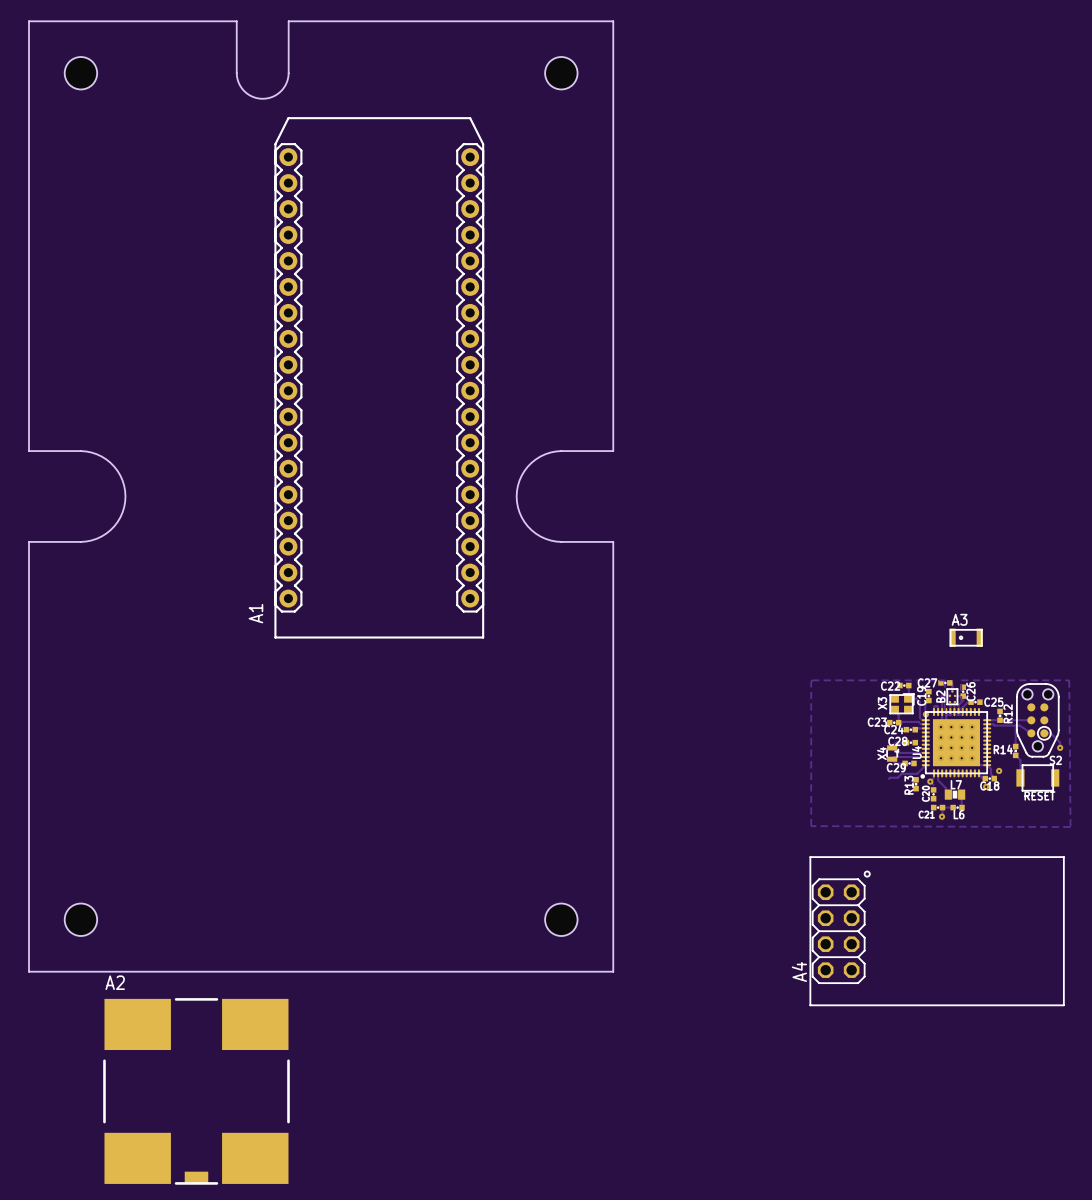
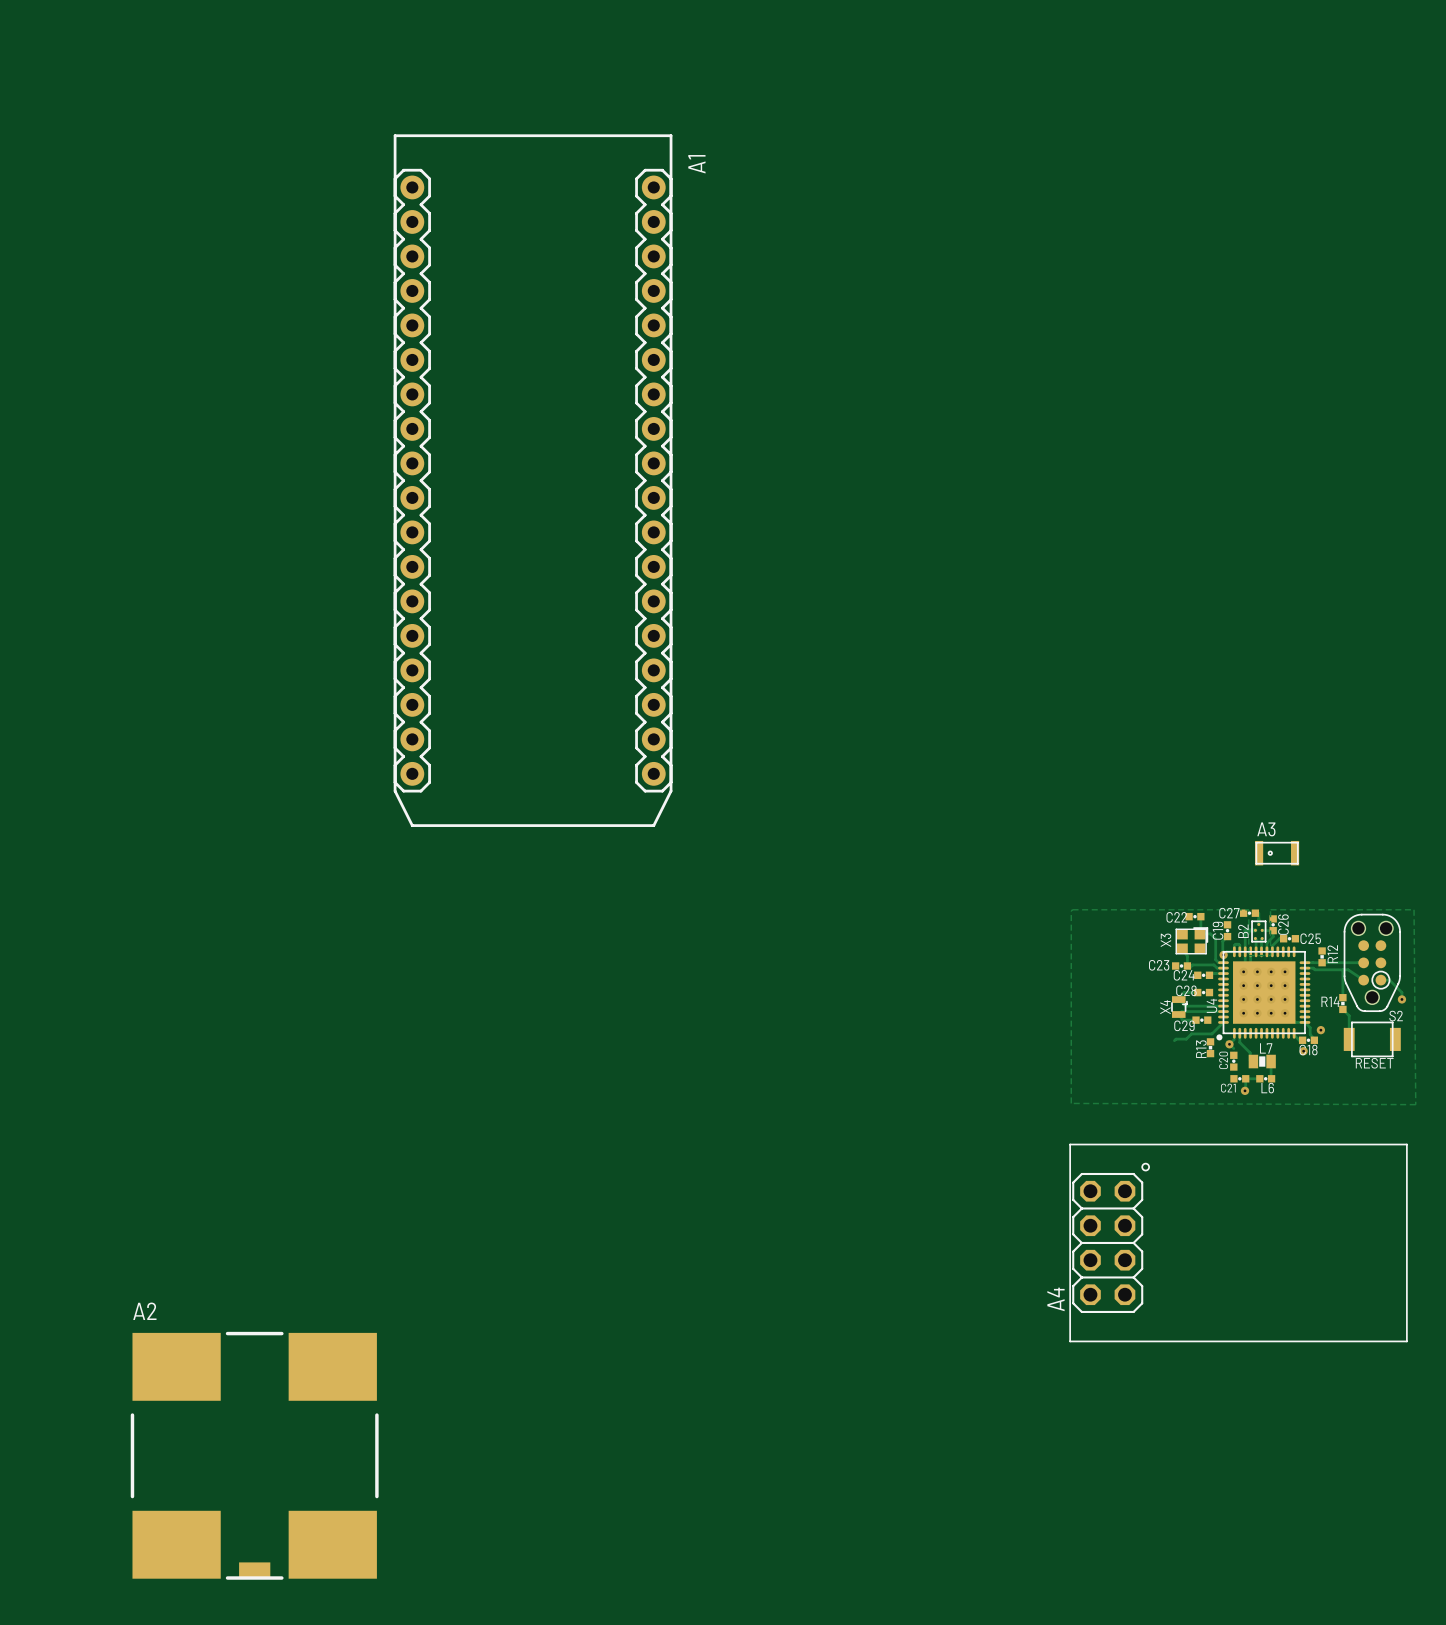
board edge: (29, 21) (29, 451) (80, 451) (101, 456) (110, 462) (120, 475) (125, 496) (120, 517) (110, 530) (101, 536) (80, 541) (29, 541) (29, 971) (613, 971) (613, 541) (561, 541) (540, 536) (524, 522) (519, 512) (516, 496) (519, 480) (524, 470) (540, 456) (561, 451) (613, 451) (613, 21) (288, 21) (287, 79) (278, 93) (262, 98) (247, 93) (237, 79) (236, 21) (29, 21) -> none
hole: (80, 73) -> none
hole: (561, 73) -> none
A1 rotation: 0° (379, 377) -> 180° (533, 480)
hole: (80, 919) -> none
hole: (561, 919) -> none

